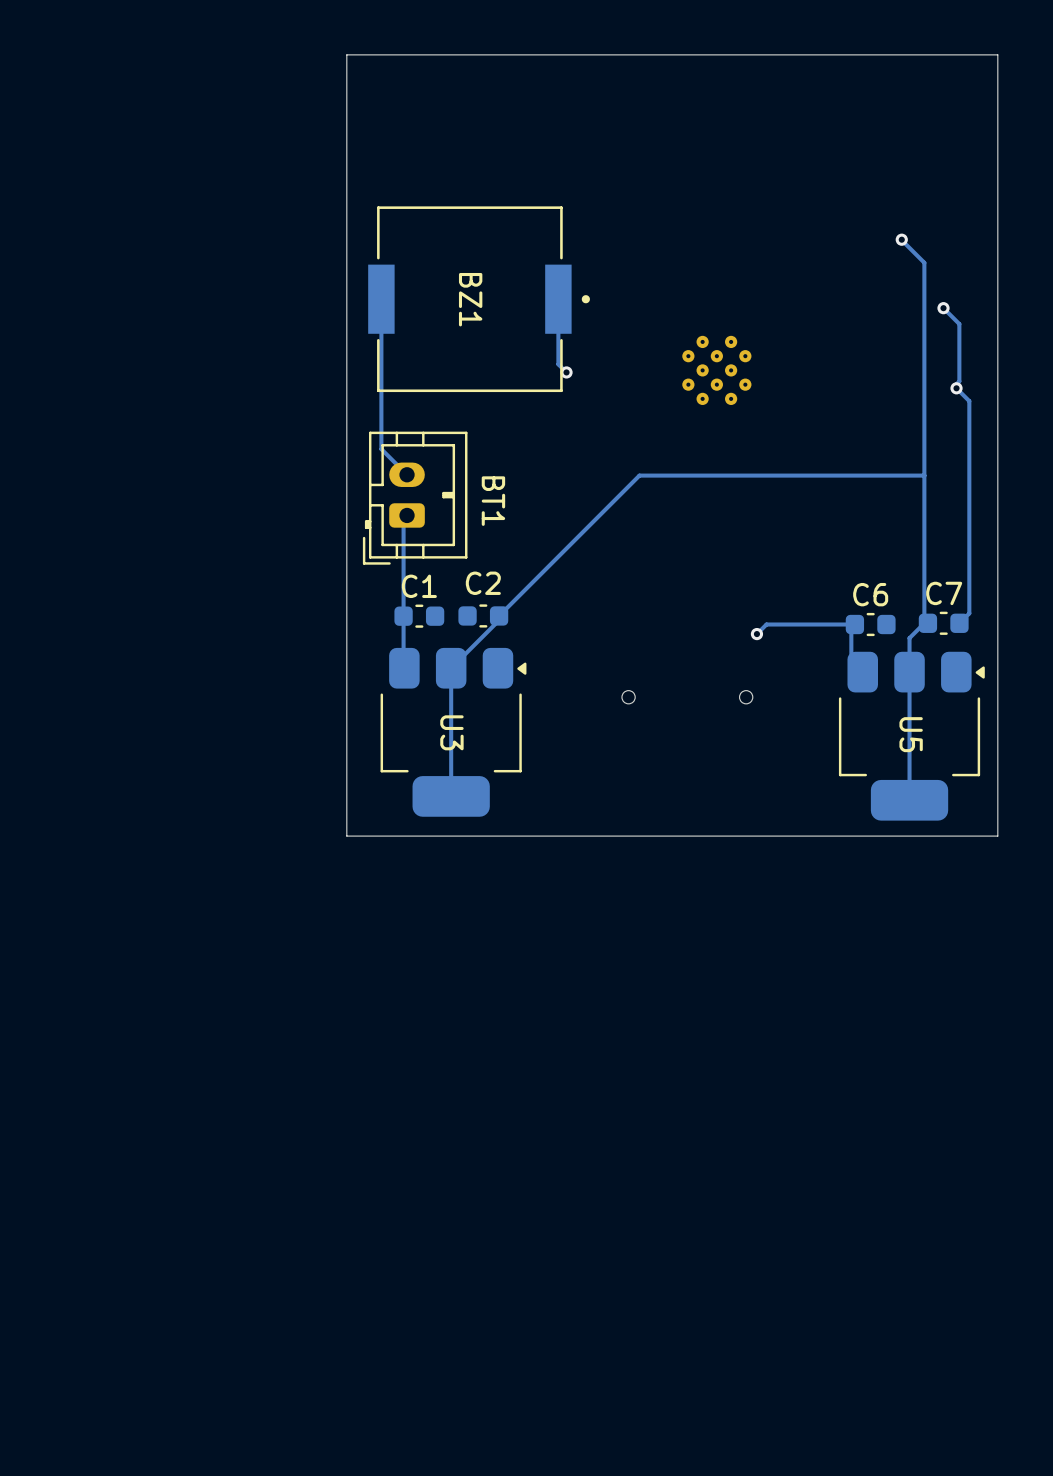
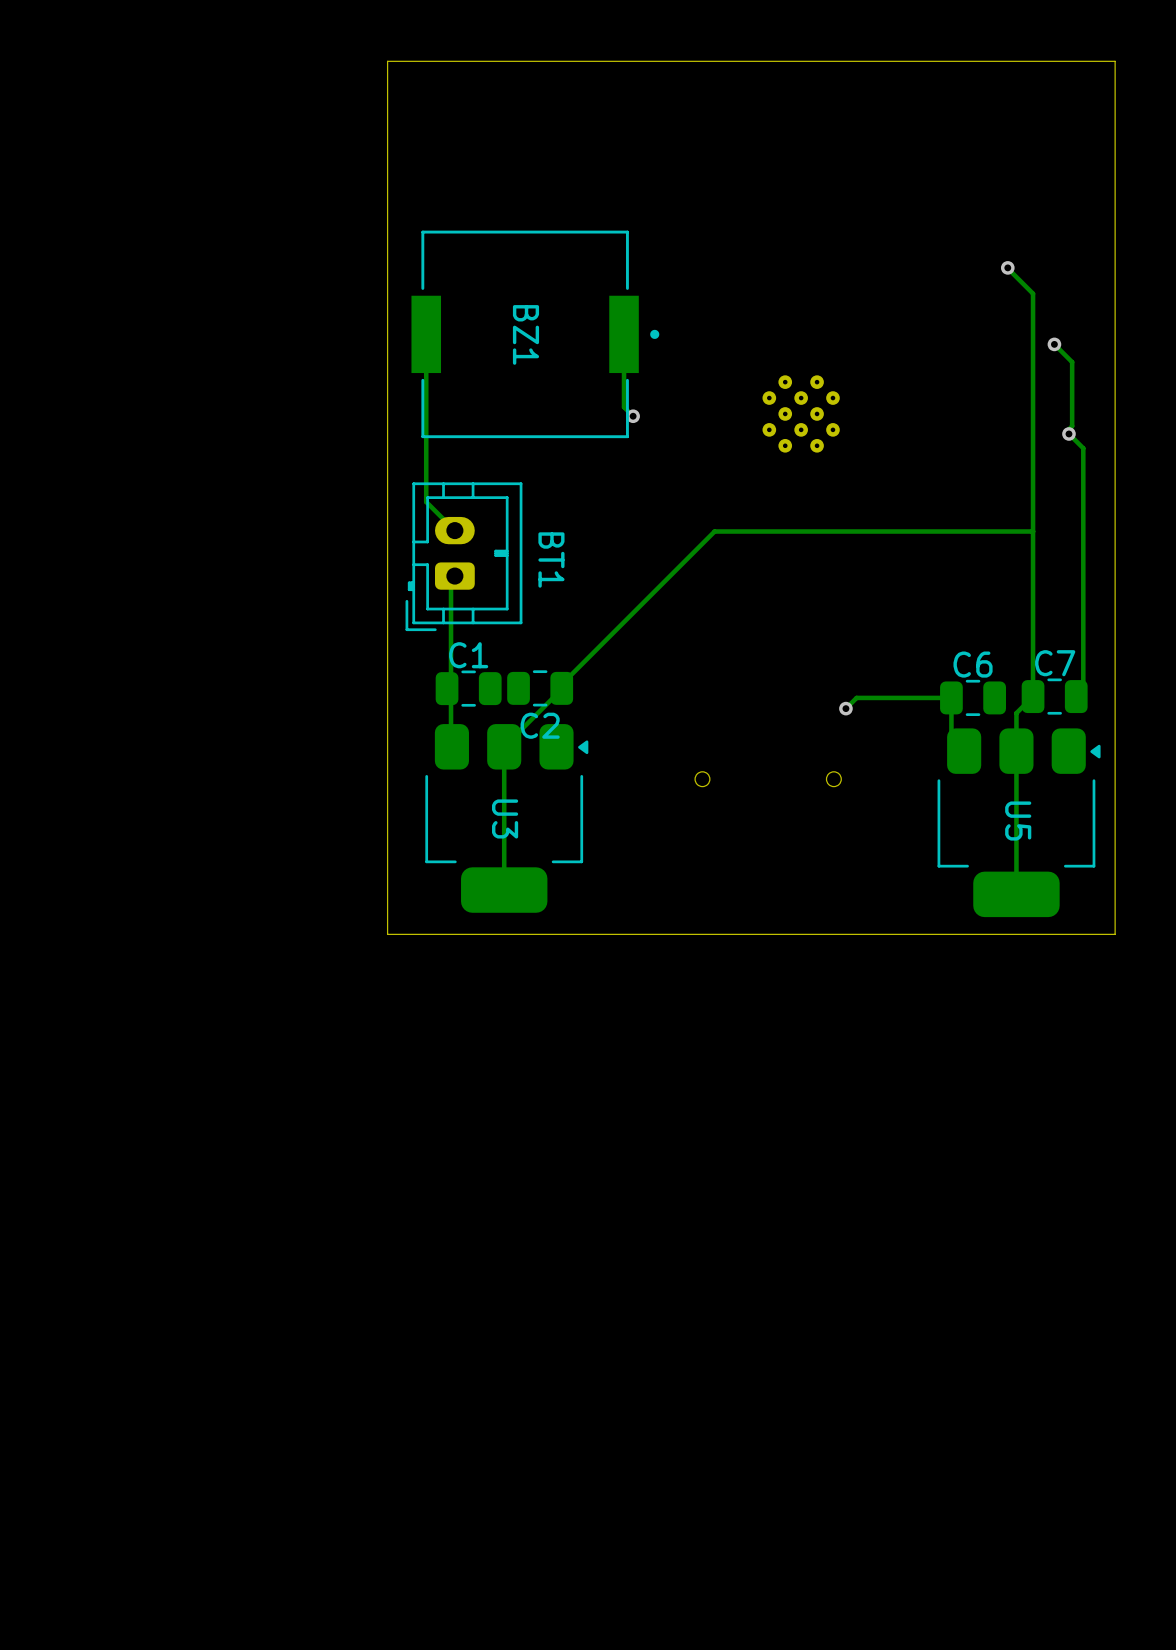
C2 name position: C2 (483, 583) -> C2 (540, 725)
C1 footprint: [394, 604, 445, 628] -> [435, 670, 502, 707]
C2 footprint: [458, 604, 509, 628] -> [507, 670, 574, 707]
C7 footprint: [918, 611, 969, 635] -> [1021, 678, 1088, 715]
C6 footprint: [845, 612, 896, 637] -> [940, 679, 1006, 717]

